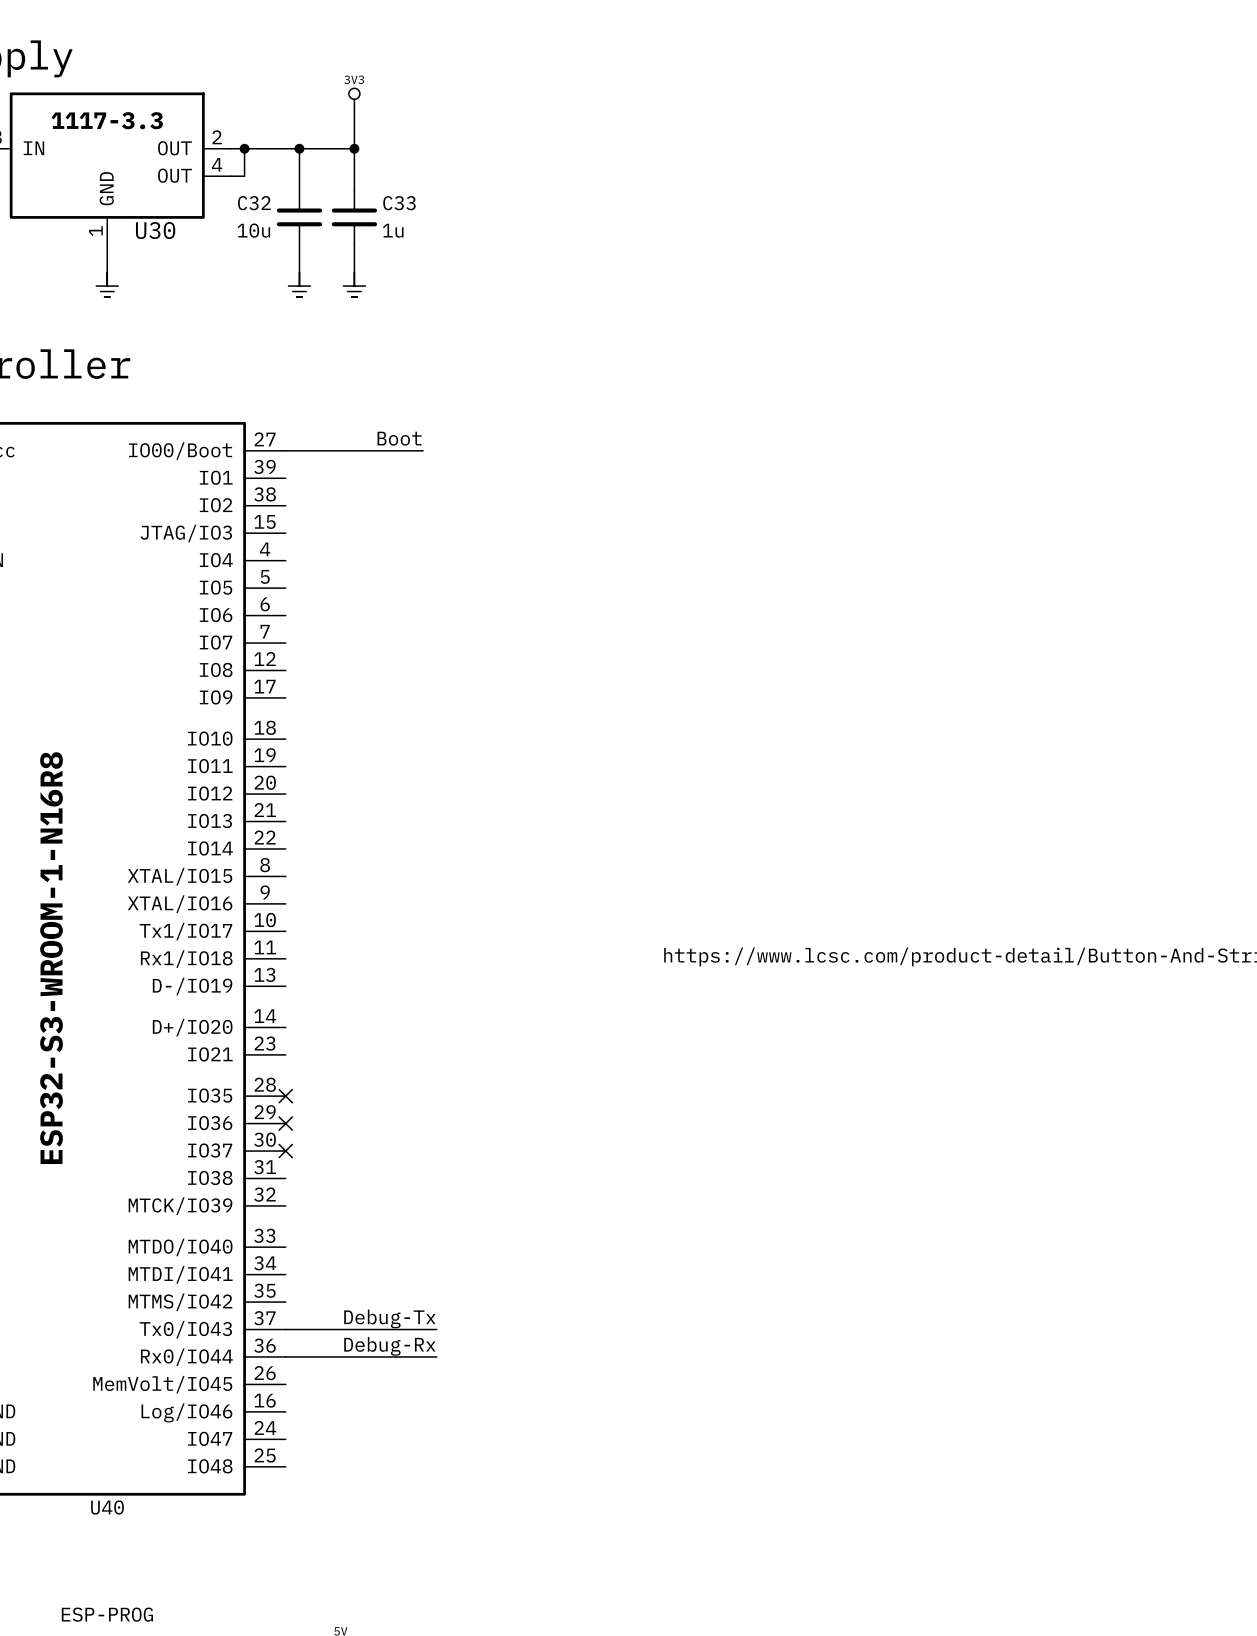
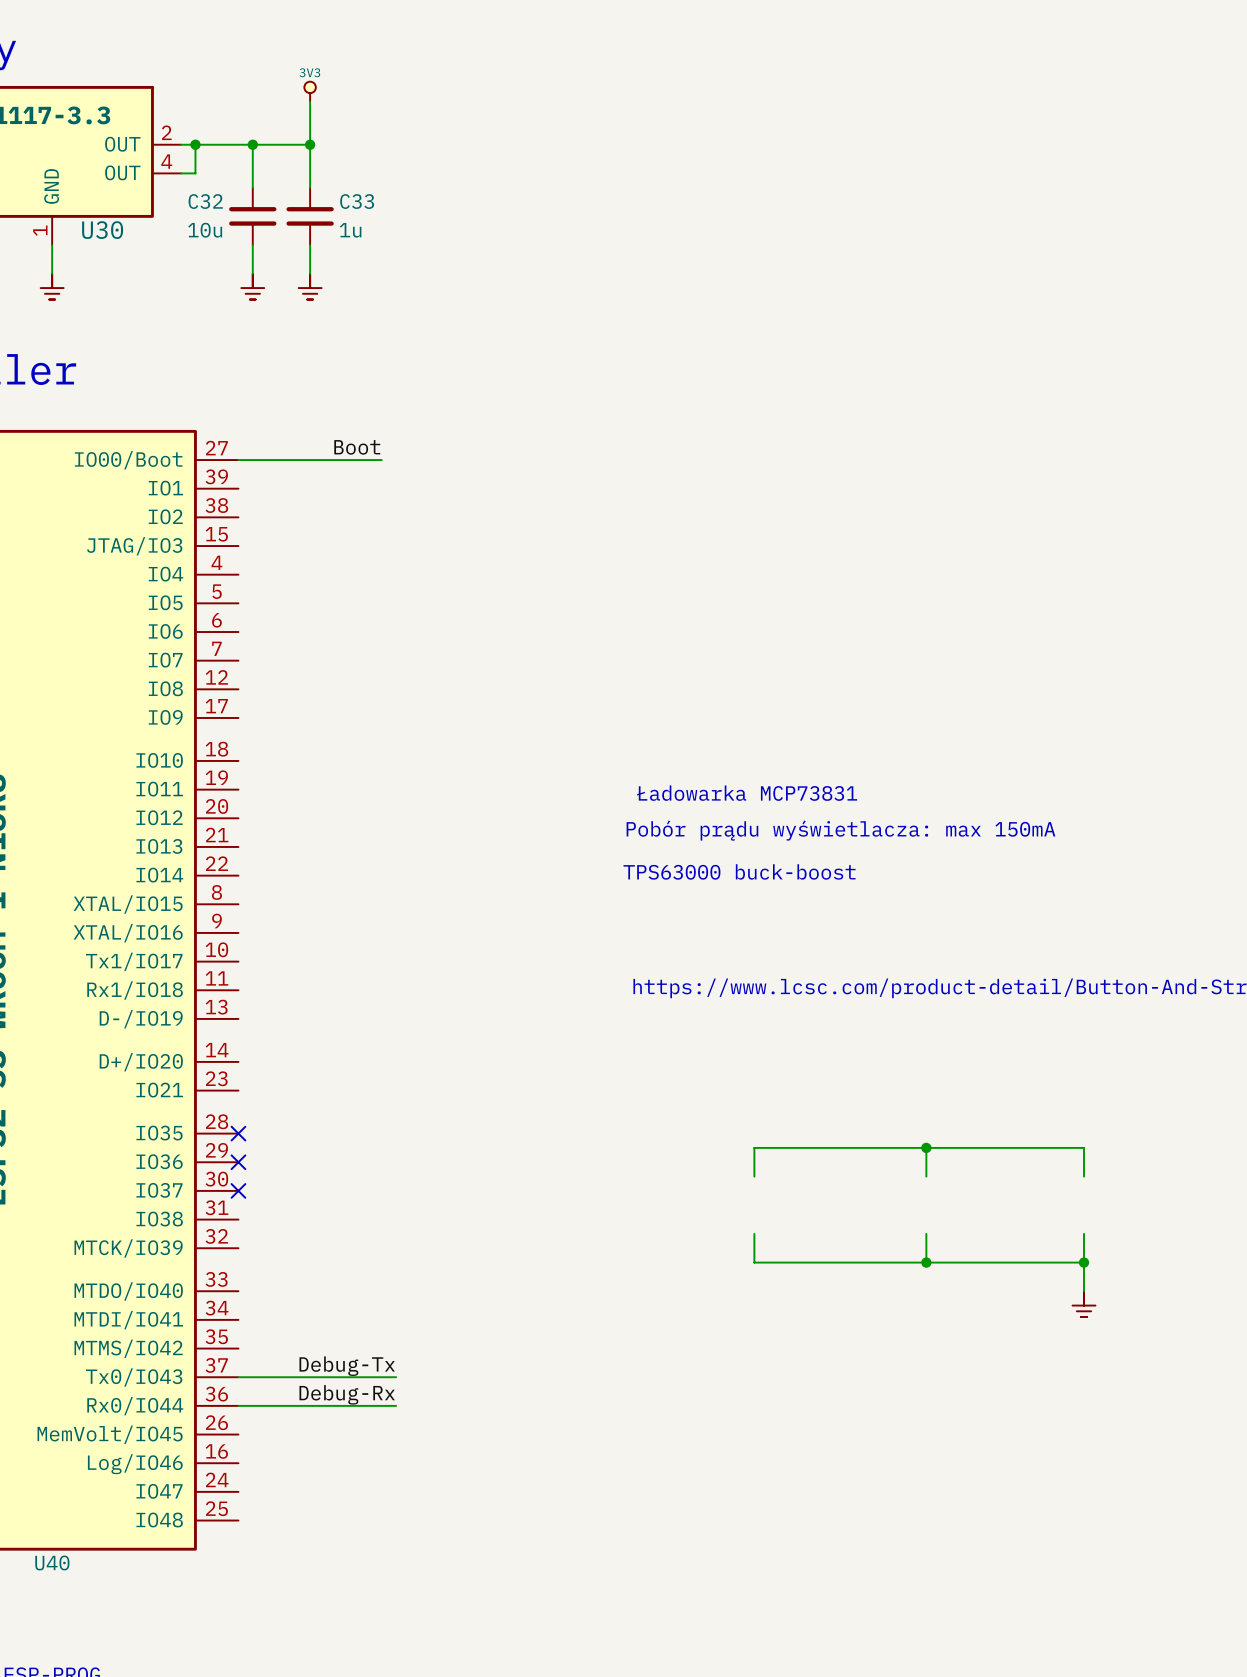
text: none -> Ładowarka MCP73831 (747, 793)
text: none -> Pobór prądu wyświetlacza: max 150mA (840, 830)
text: none -> TPS63000 buck-boost (739, 871)
wire: none -> (926, 1147) (926, 1176)
junction: none -> (926, 1147)
wire: none -> (754, 1176) (754, 1147) (1084, 1147) (1084, 1176)
wire: none -> (754, 1233) (754, 1262) (1084, 1262)
wire: none -> (926, 1233) (926, 1262)
wire: none -> (1084, 1233) (1084, 1291)
junction: none -> (926, 1262)
junction: none -> (1084, 1262)
power symbol: none -> (1084, 1304)

